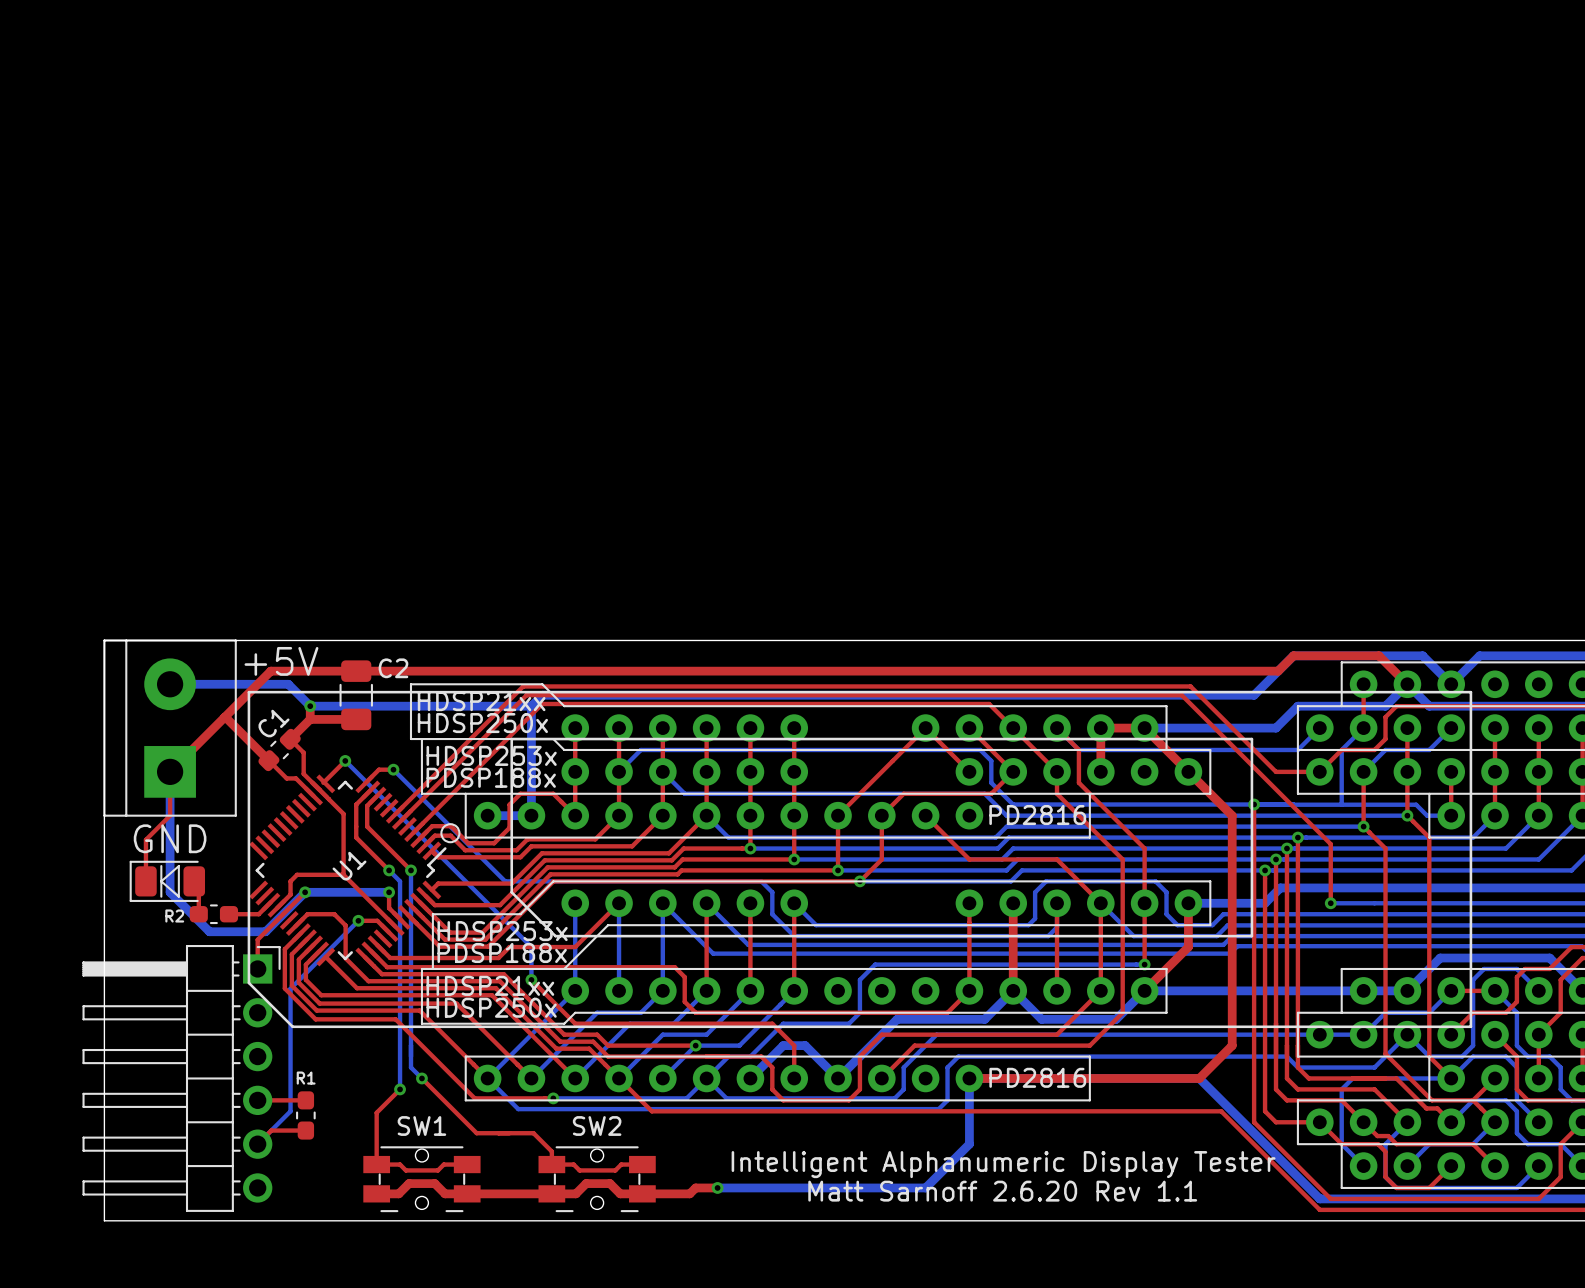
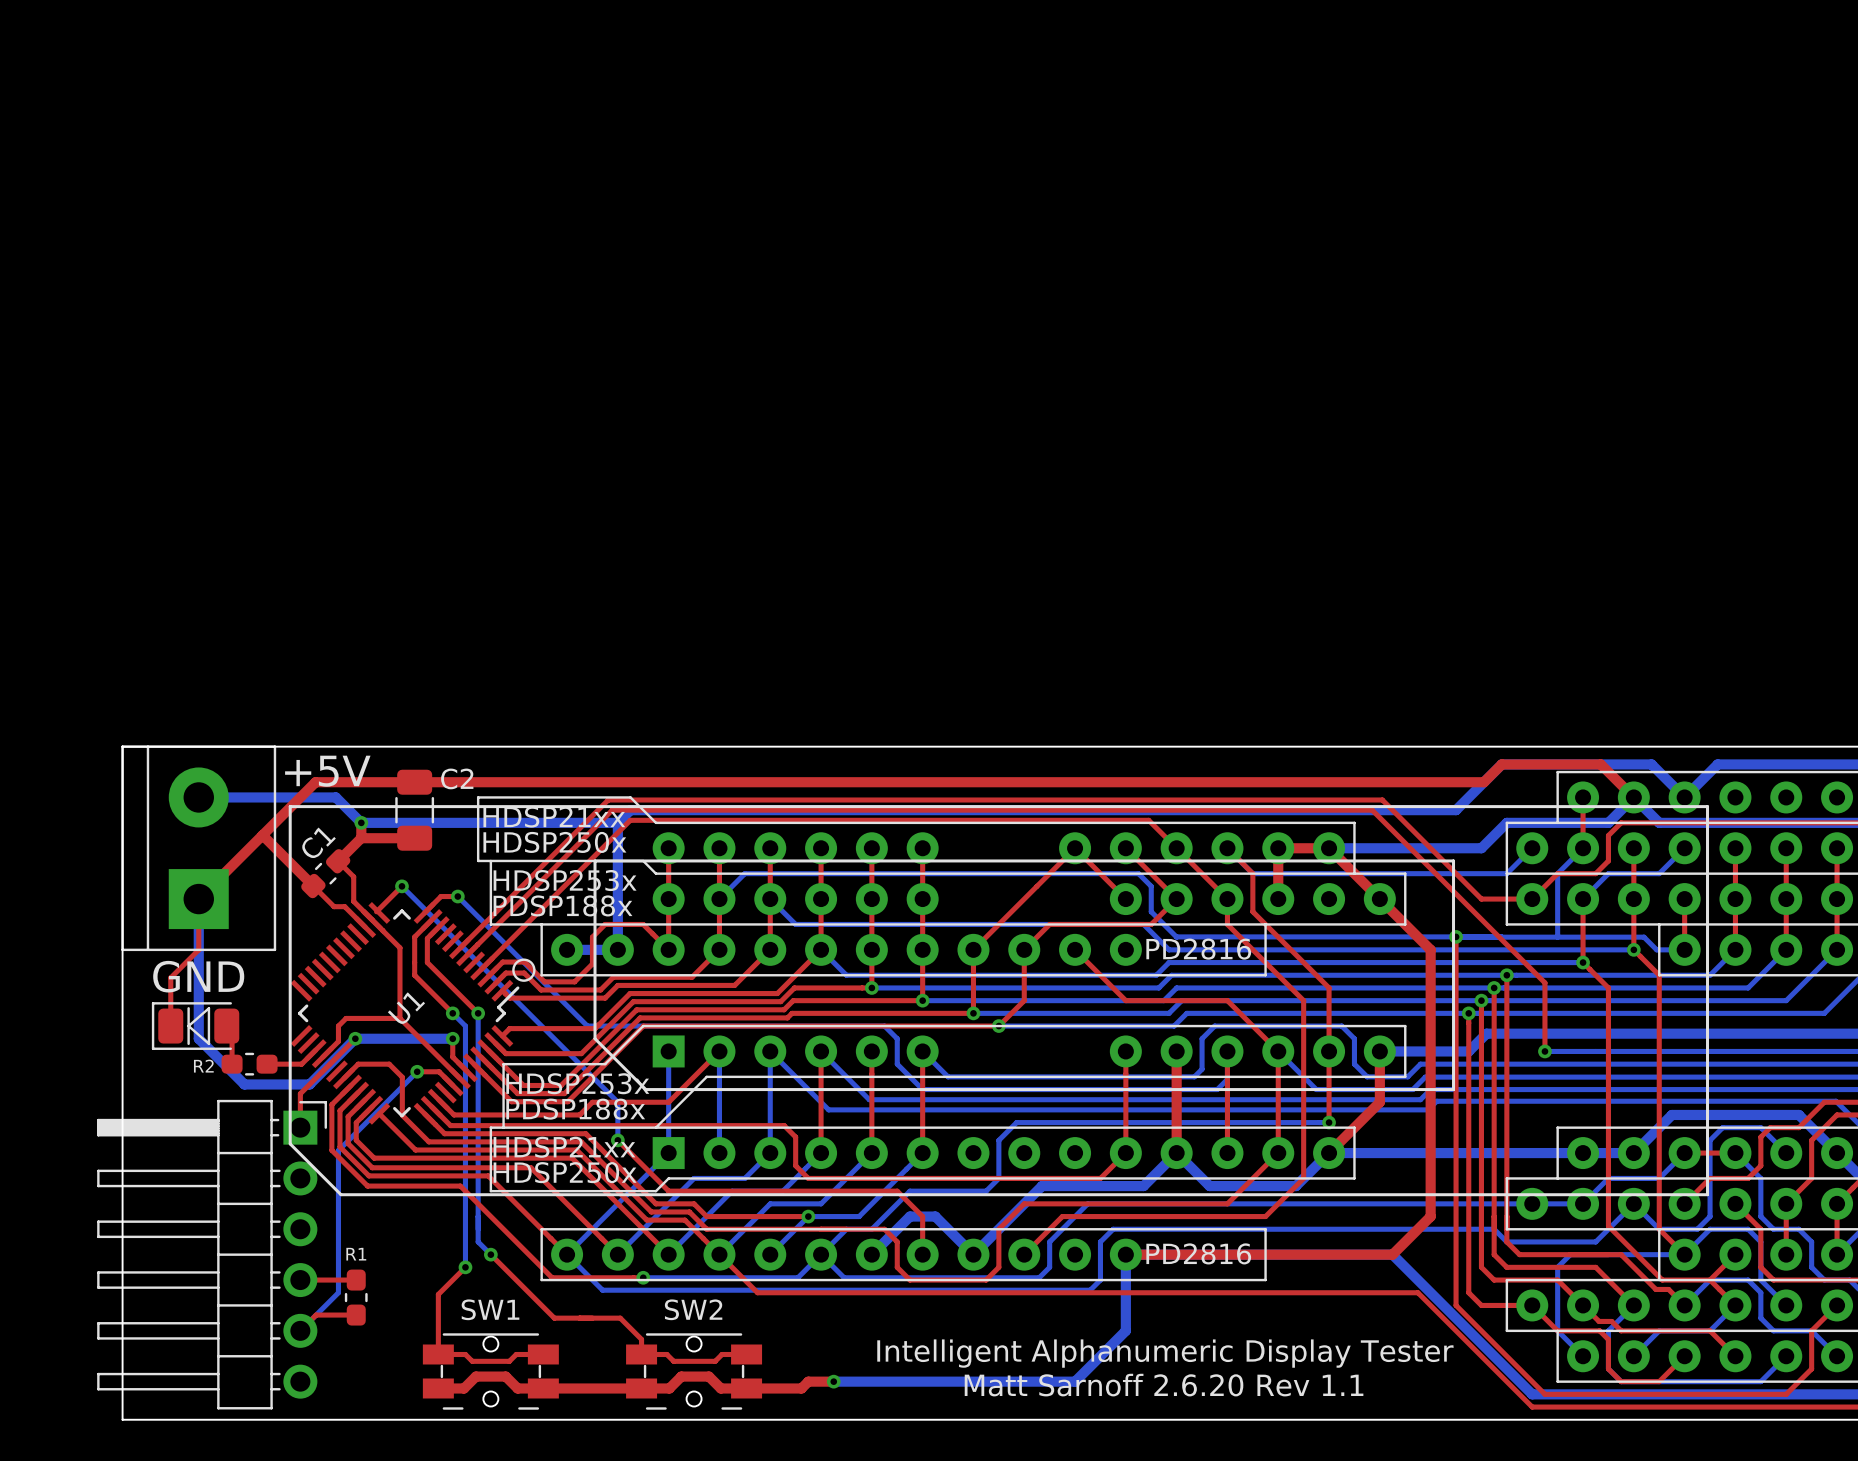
part footprint: [247, 690, 1473, 1029] -> [288, 805, 1710, 1197]
part footprint: [510, 737, 1254, 938] -> [593, 859, 1456, 1092]

